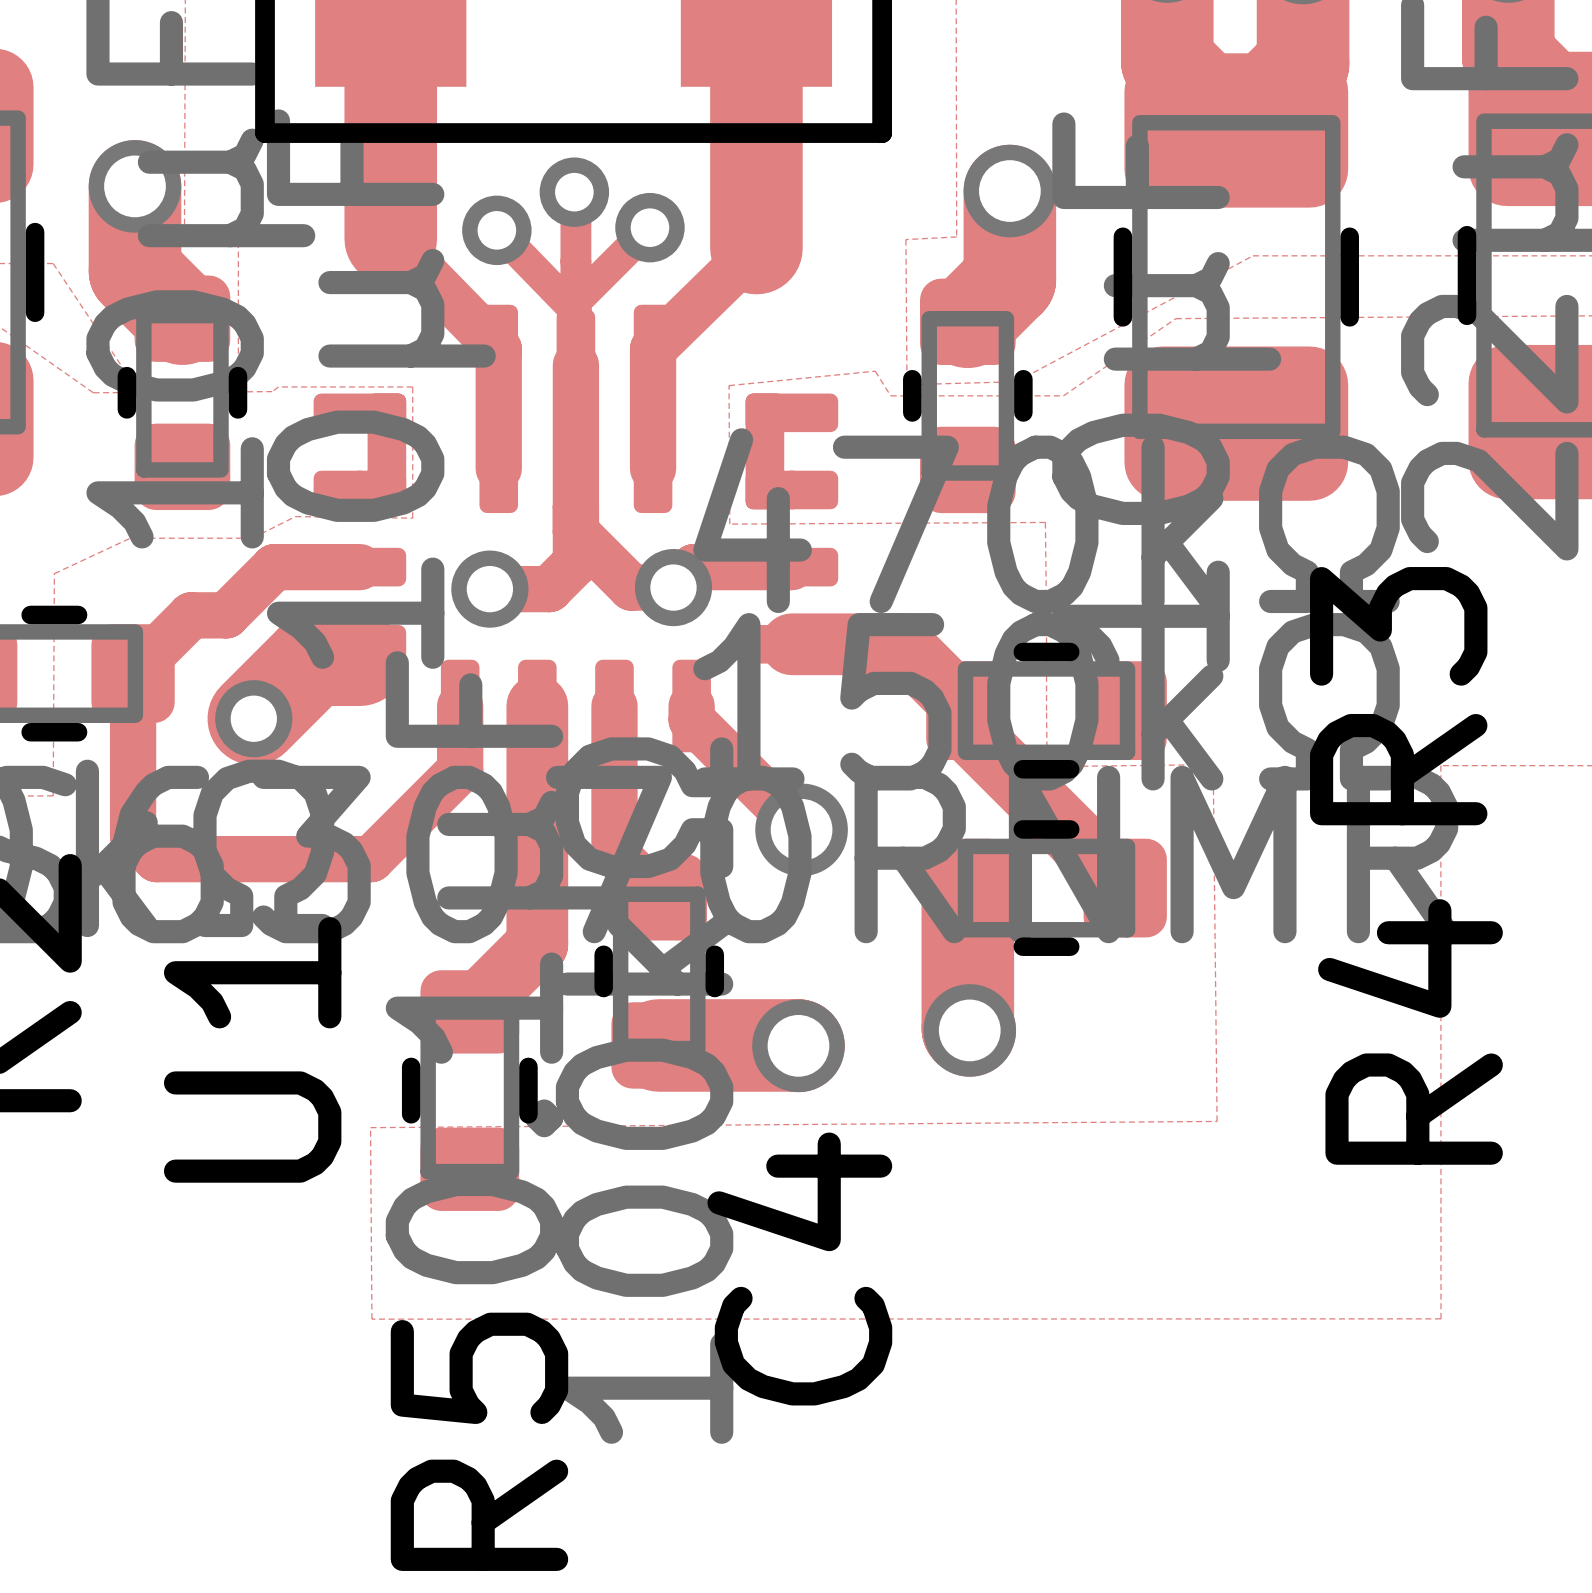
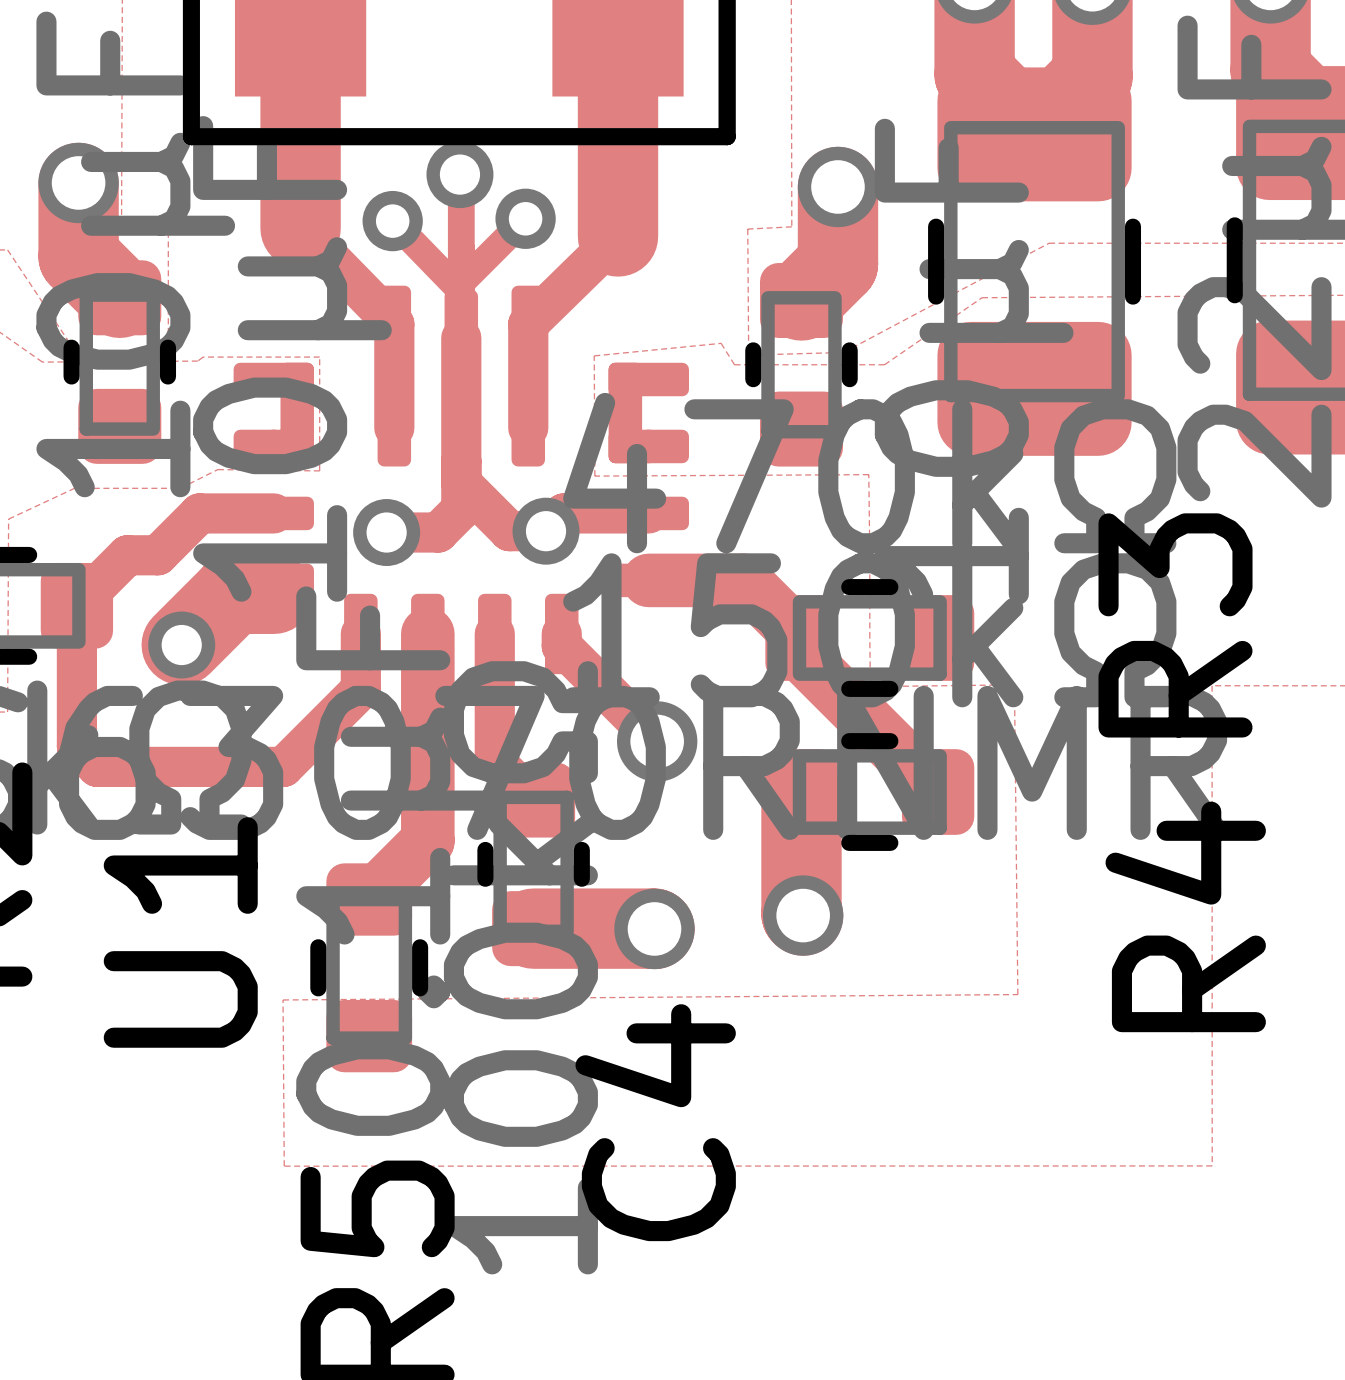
via size: [539, 157, 610, 227] -> [426, 141, 494, 209]

